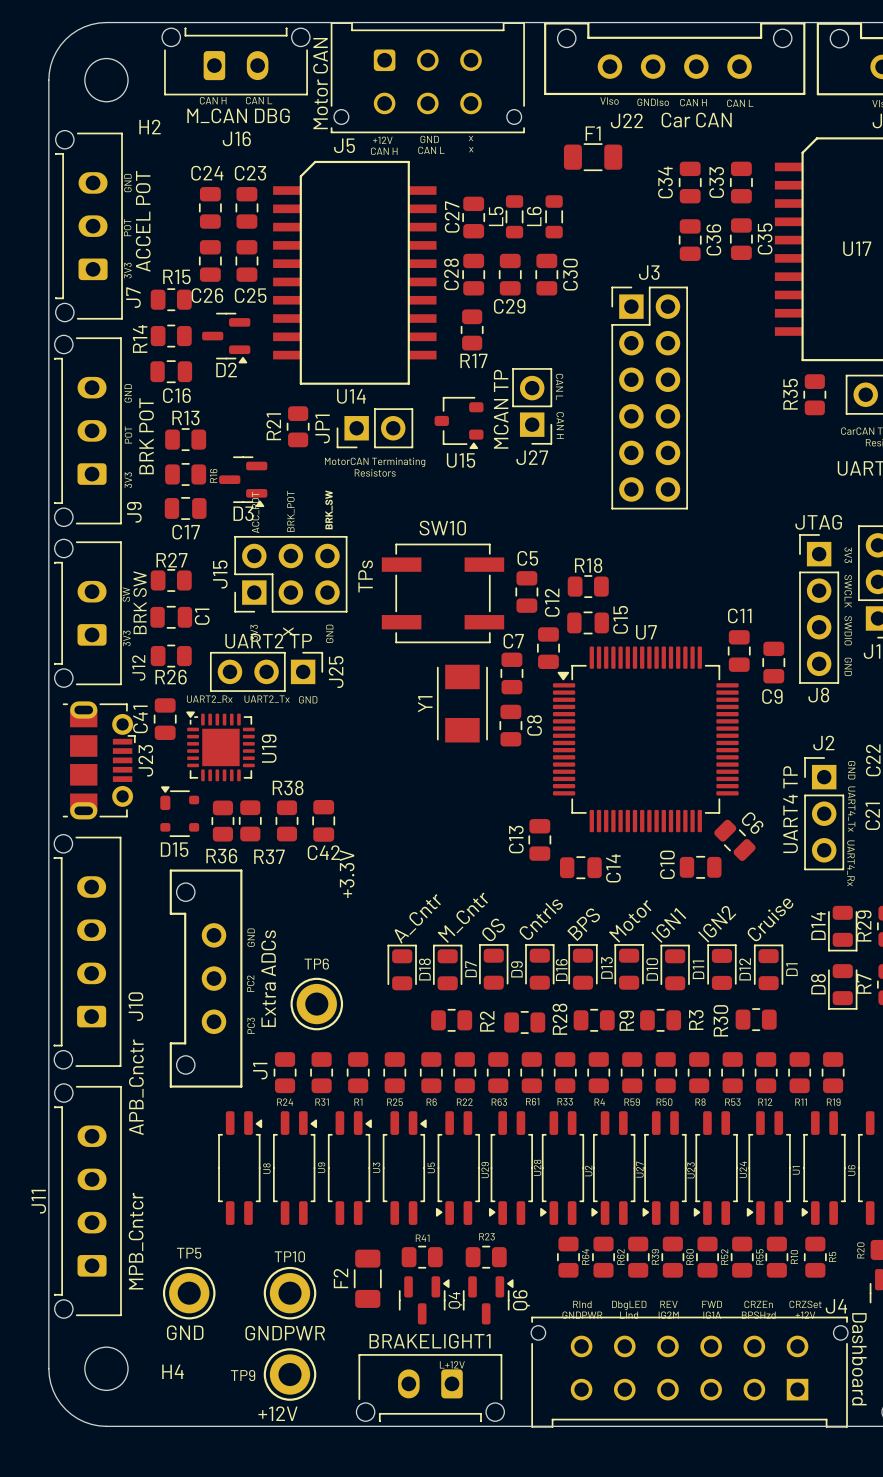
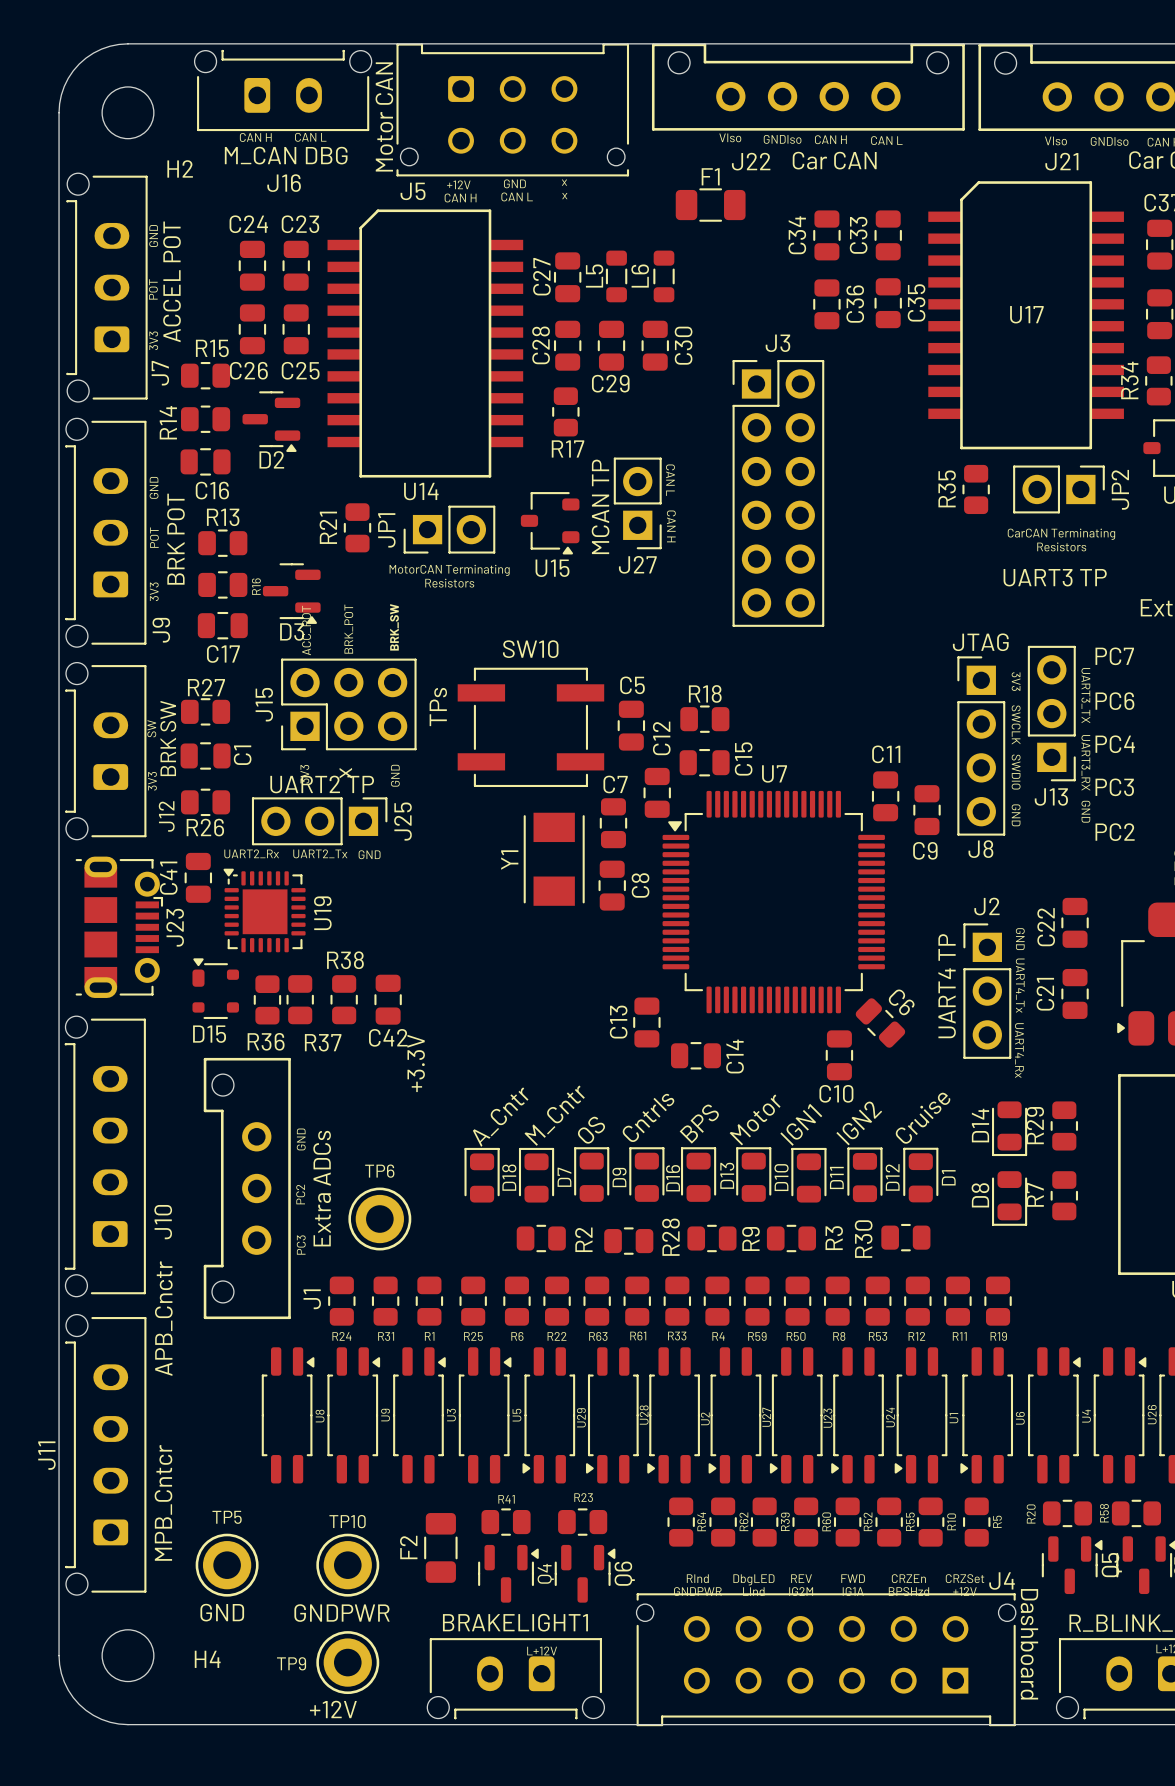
C10 name position: C10 (667, 864) -> C10 (836, 1093)
C10 rotation: 0° (700, 867) -> 90° clockwise (839, 1055)

